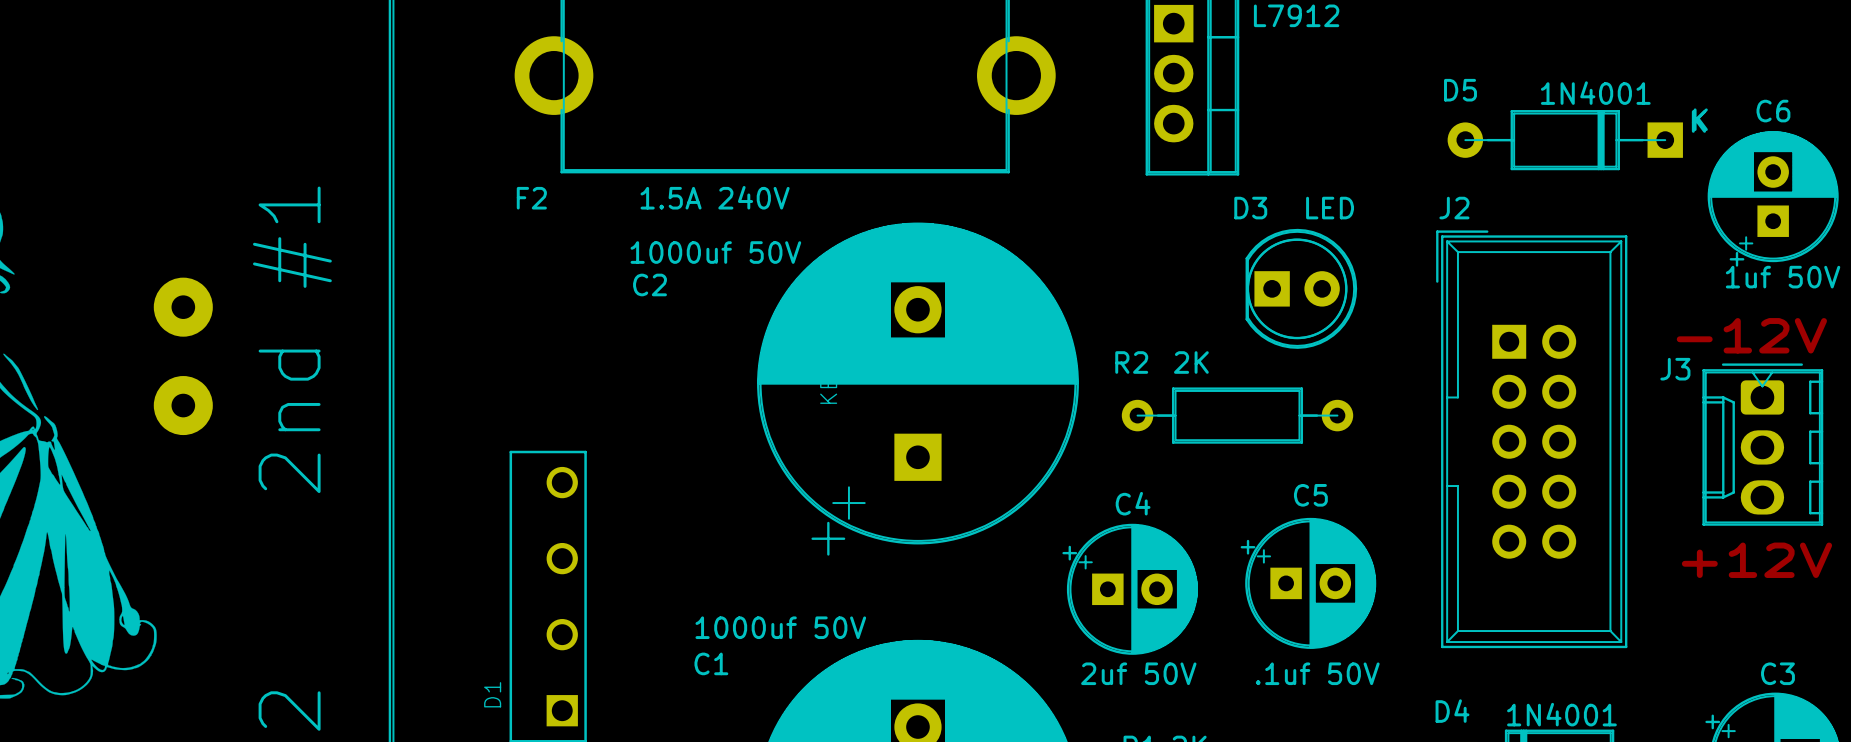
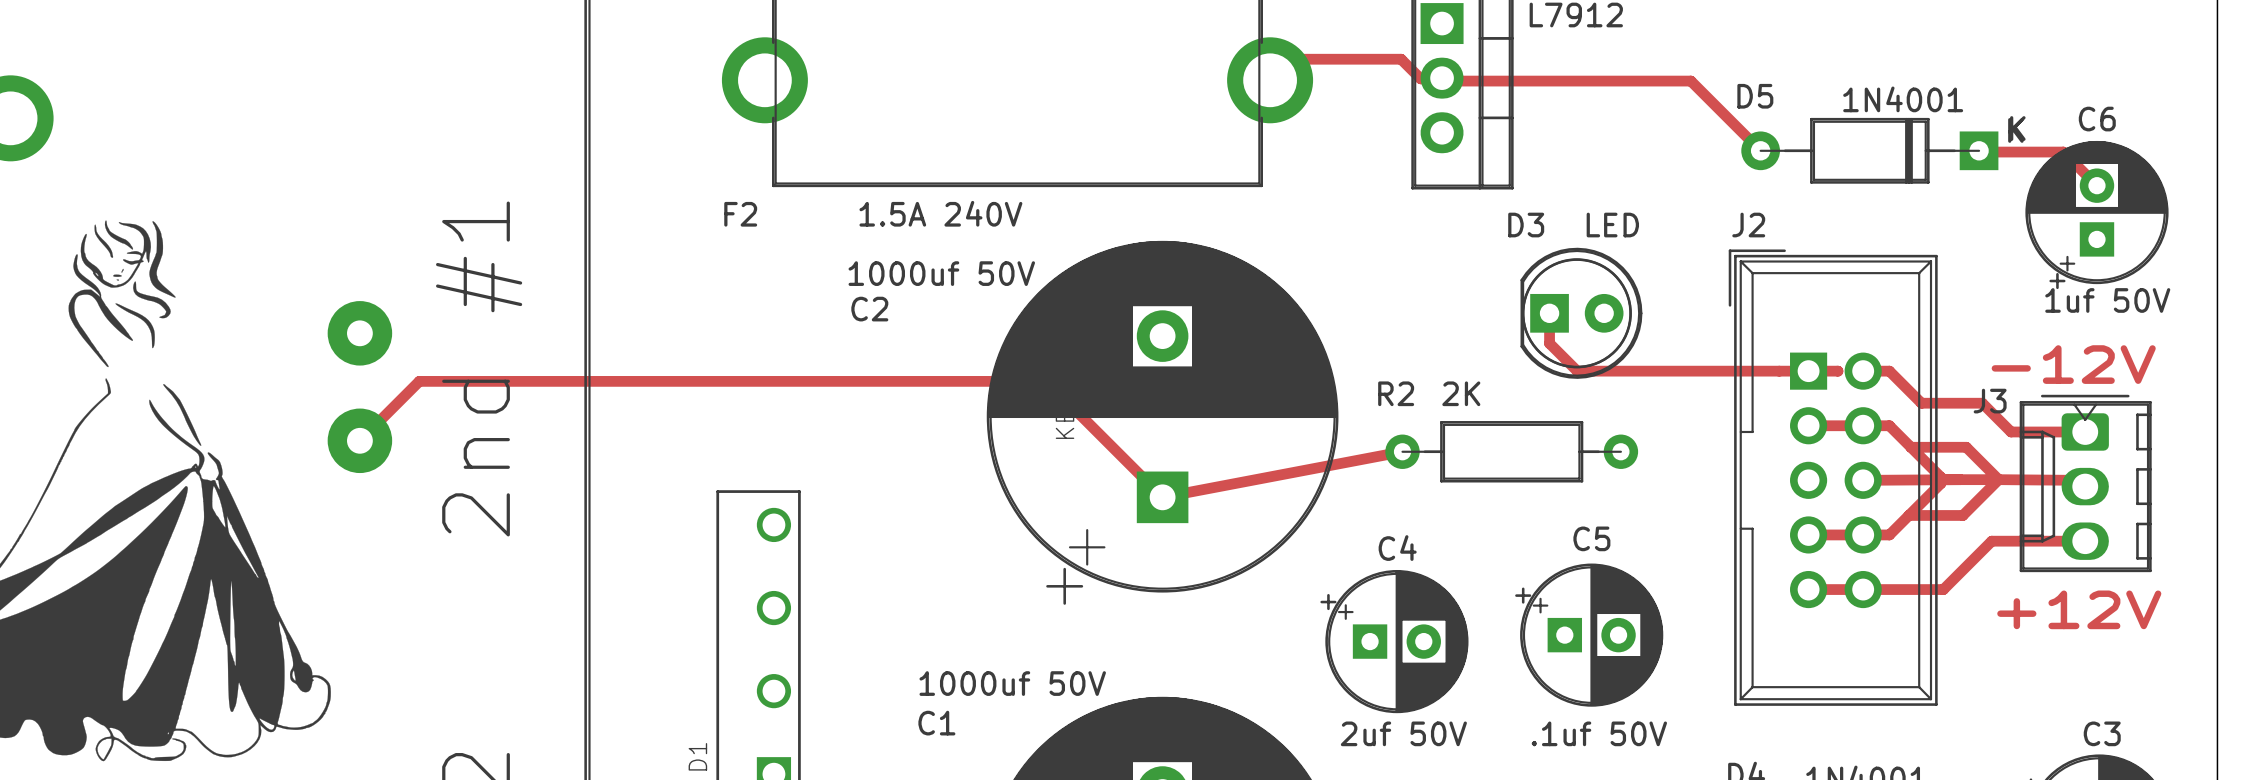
track: none -> (1270, 80) (1291, 59) (1401, 59) (1420, 78) (1442, 78) (1444, 81) (1690, 81) (1760, 150)
track: none -> (1979, 150) (2063, 152) (2096, 185)
track: none -> (1549, 313) (1549, 343) (1577, 371) (1837, 371)
track: none -> (1863, 371) (1889, 371) (1921, 403) (1982, 403) (2011, 431) (2085, 431)
track: none -> (1808, 425) (1889, 425) (1943, 479) (1998, 479)
track: none -> (359, 440) (419, 381) (1046, 381) (1162, 497) (1402, 451)
track: none -> (1910, 447) (1966, 447) (1998, 479)
track: none -> (1940, 477) (1940, 483) (1889, 534) (1808, 534)
track: none -> (1960, 479) (1863, 480)
track: none -> (1998, 479) (2079, 480) (2085, 486)
track: none -> (1998, 479) (1962, 515) (1908, 515)
track: none -> (2085, 541) (1991, 541) (1943, 589) (1808, 589)

